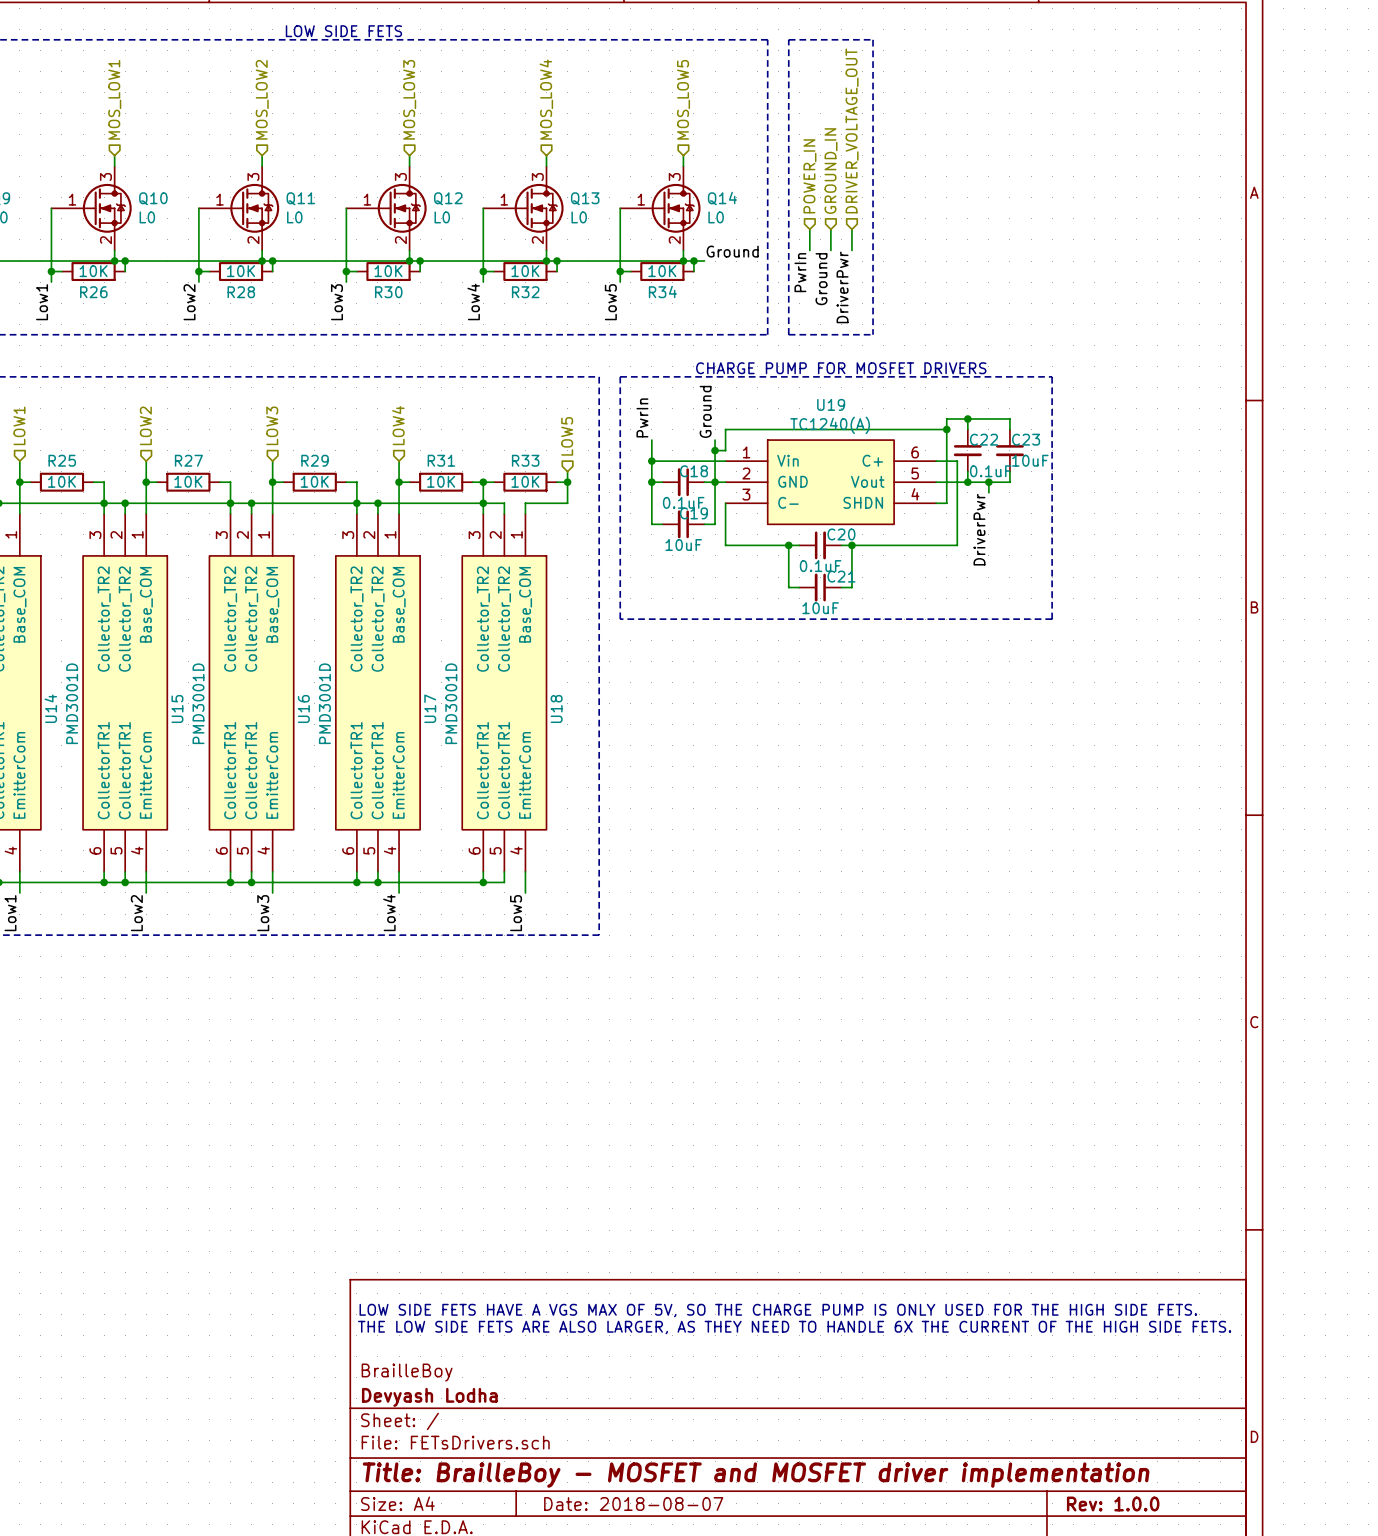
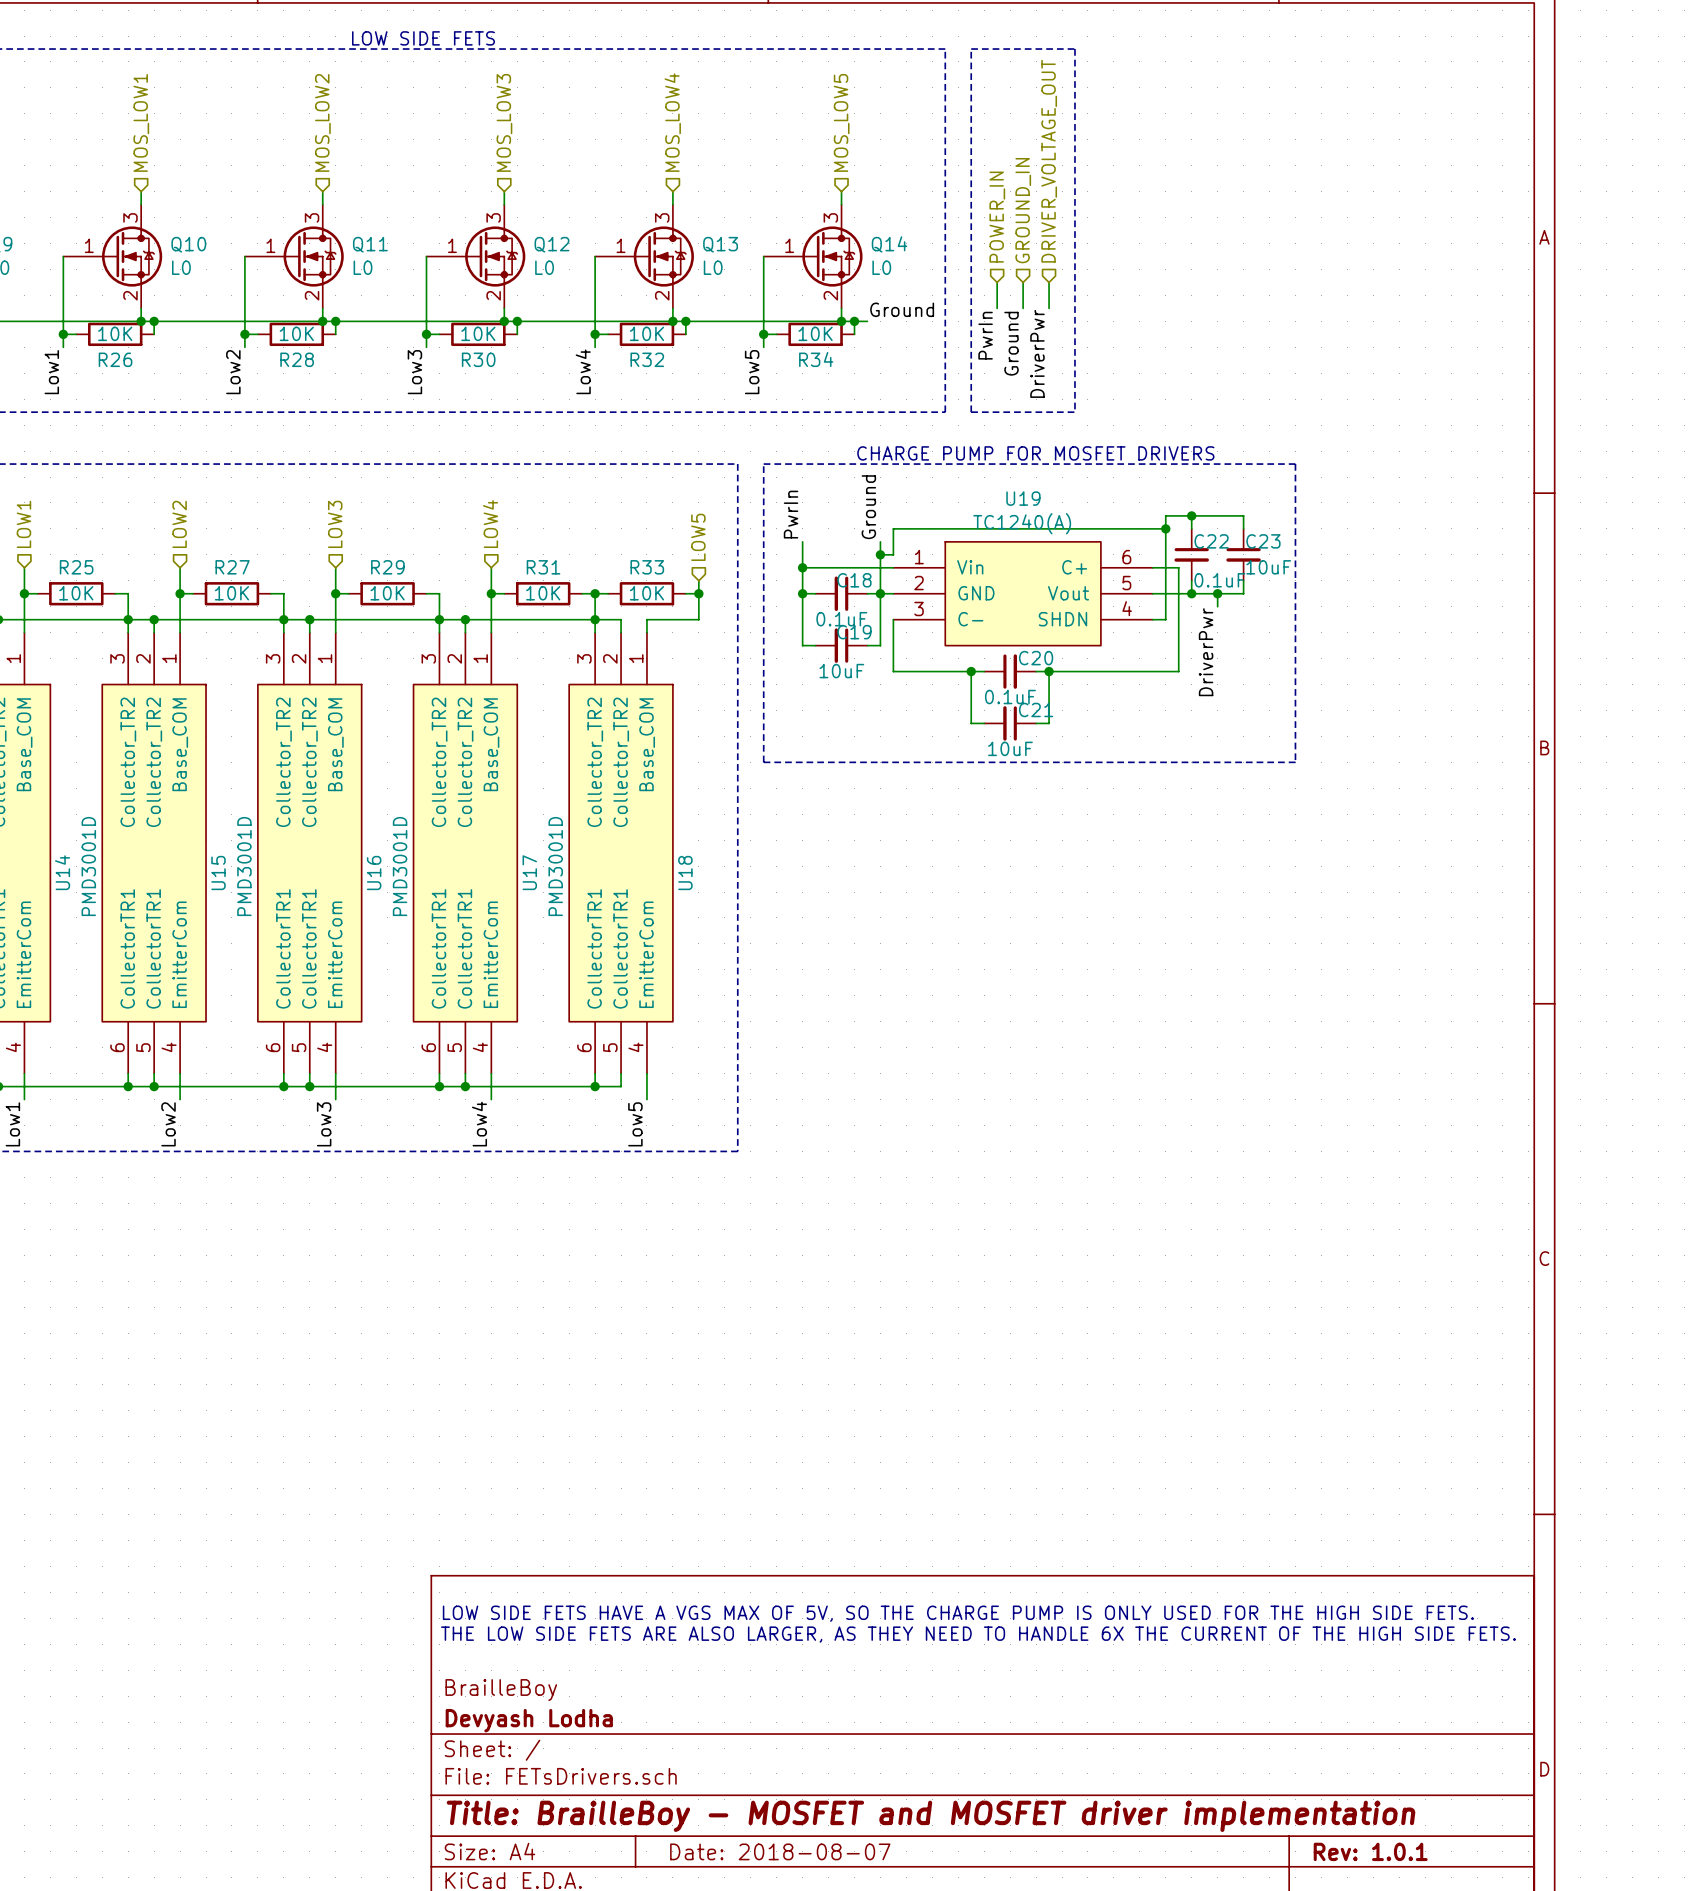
title block: Rev: 1.0.0 (1113, 1504) -> Rev: 1.0.1 (1370, 1851)

